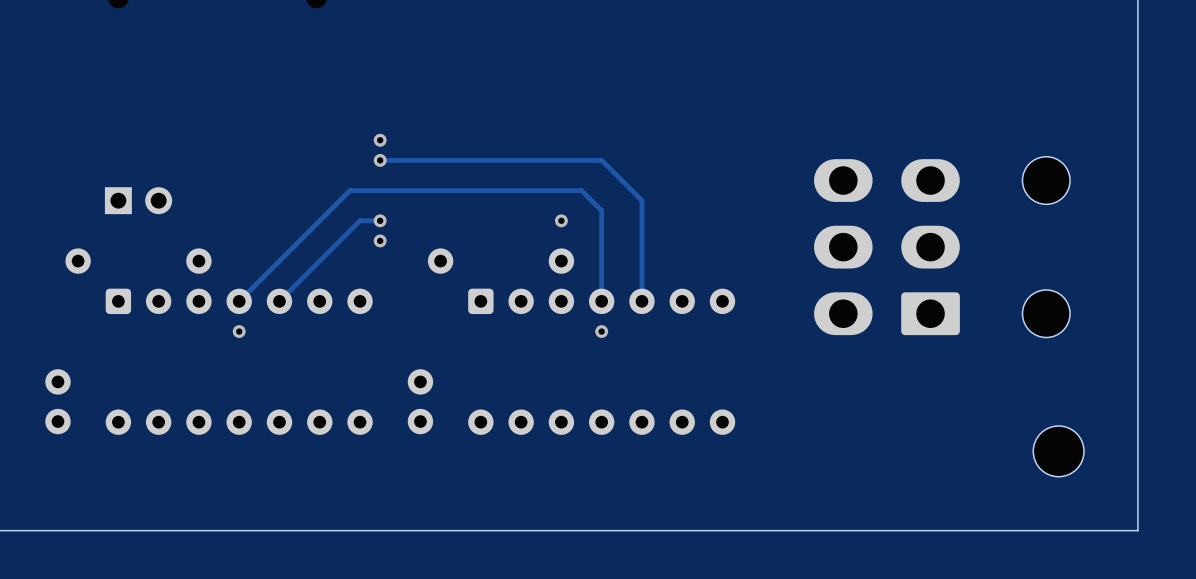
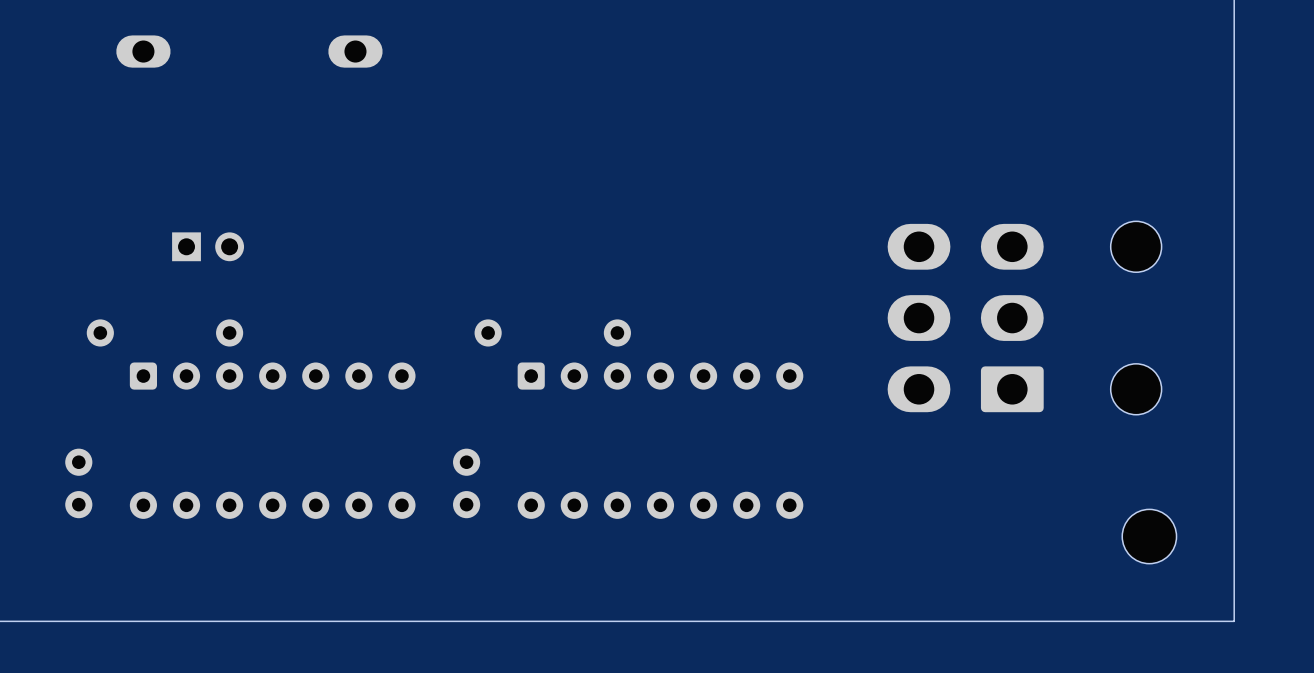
via: (380, 140) -> none
track: (380, 160) (601, 160) (641, 200) (641, 301) -> none
via: (380, 160) -> none
part position: (138, 200) -> (208, 246)
track: (380, 220) (360, 220) (279, 301) -> none
via: (380, 220) -> none
via: (561, 220) -> none
via: (380, 240) -> none
track: (601, 301) (601, 210) (581, 190) (349, 190) (239, 301) -> none
via: (239, 331) -> none
via: (601, 331) -> none

